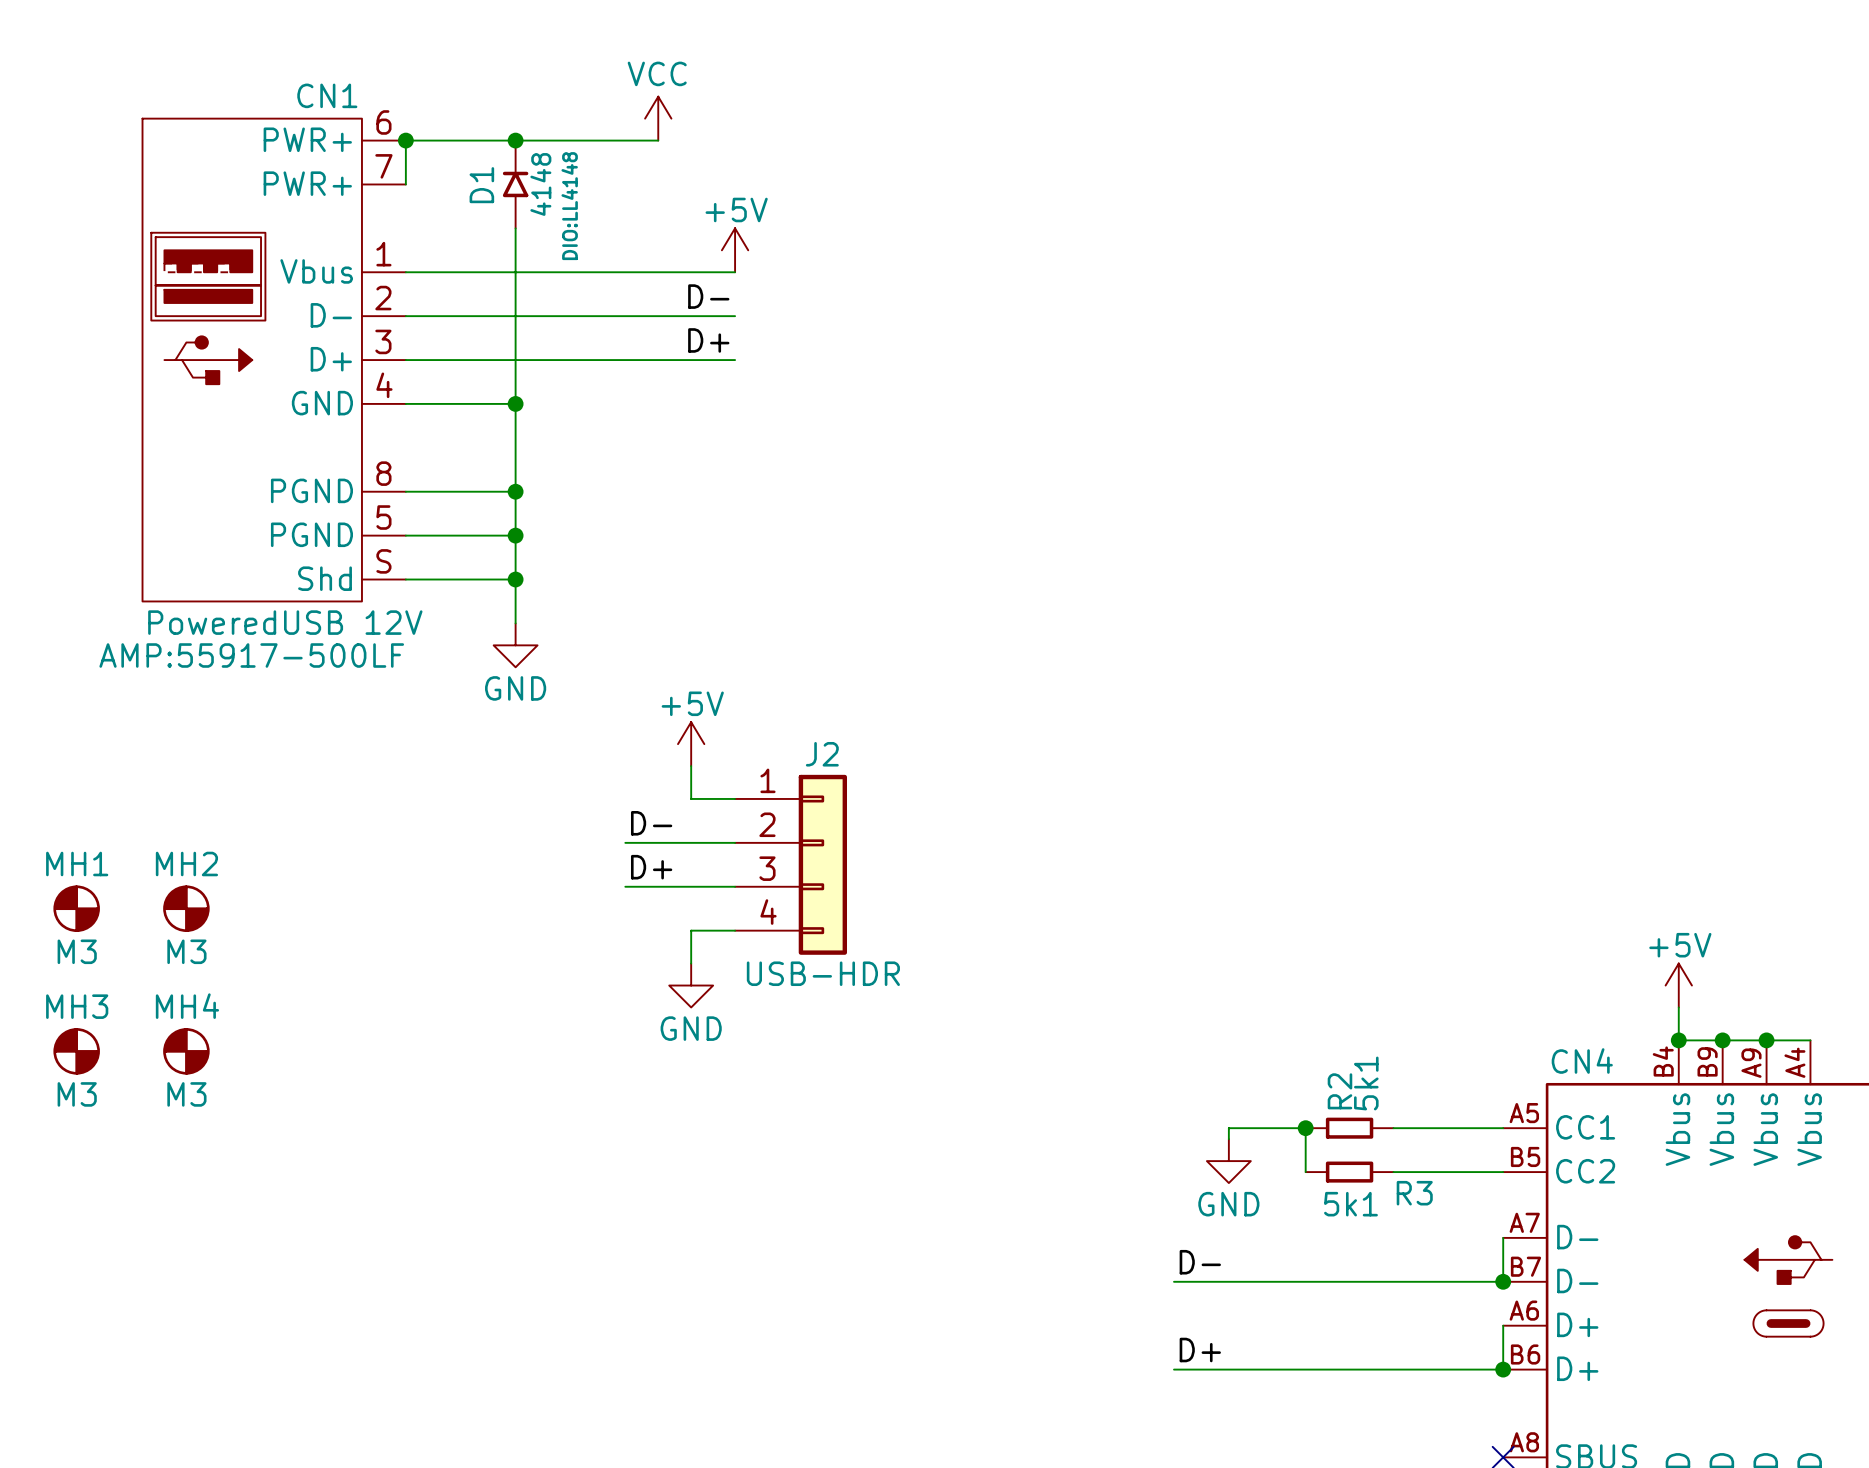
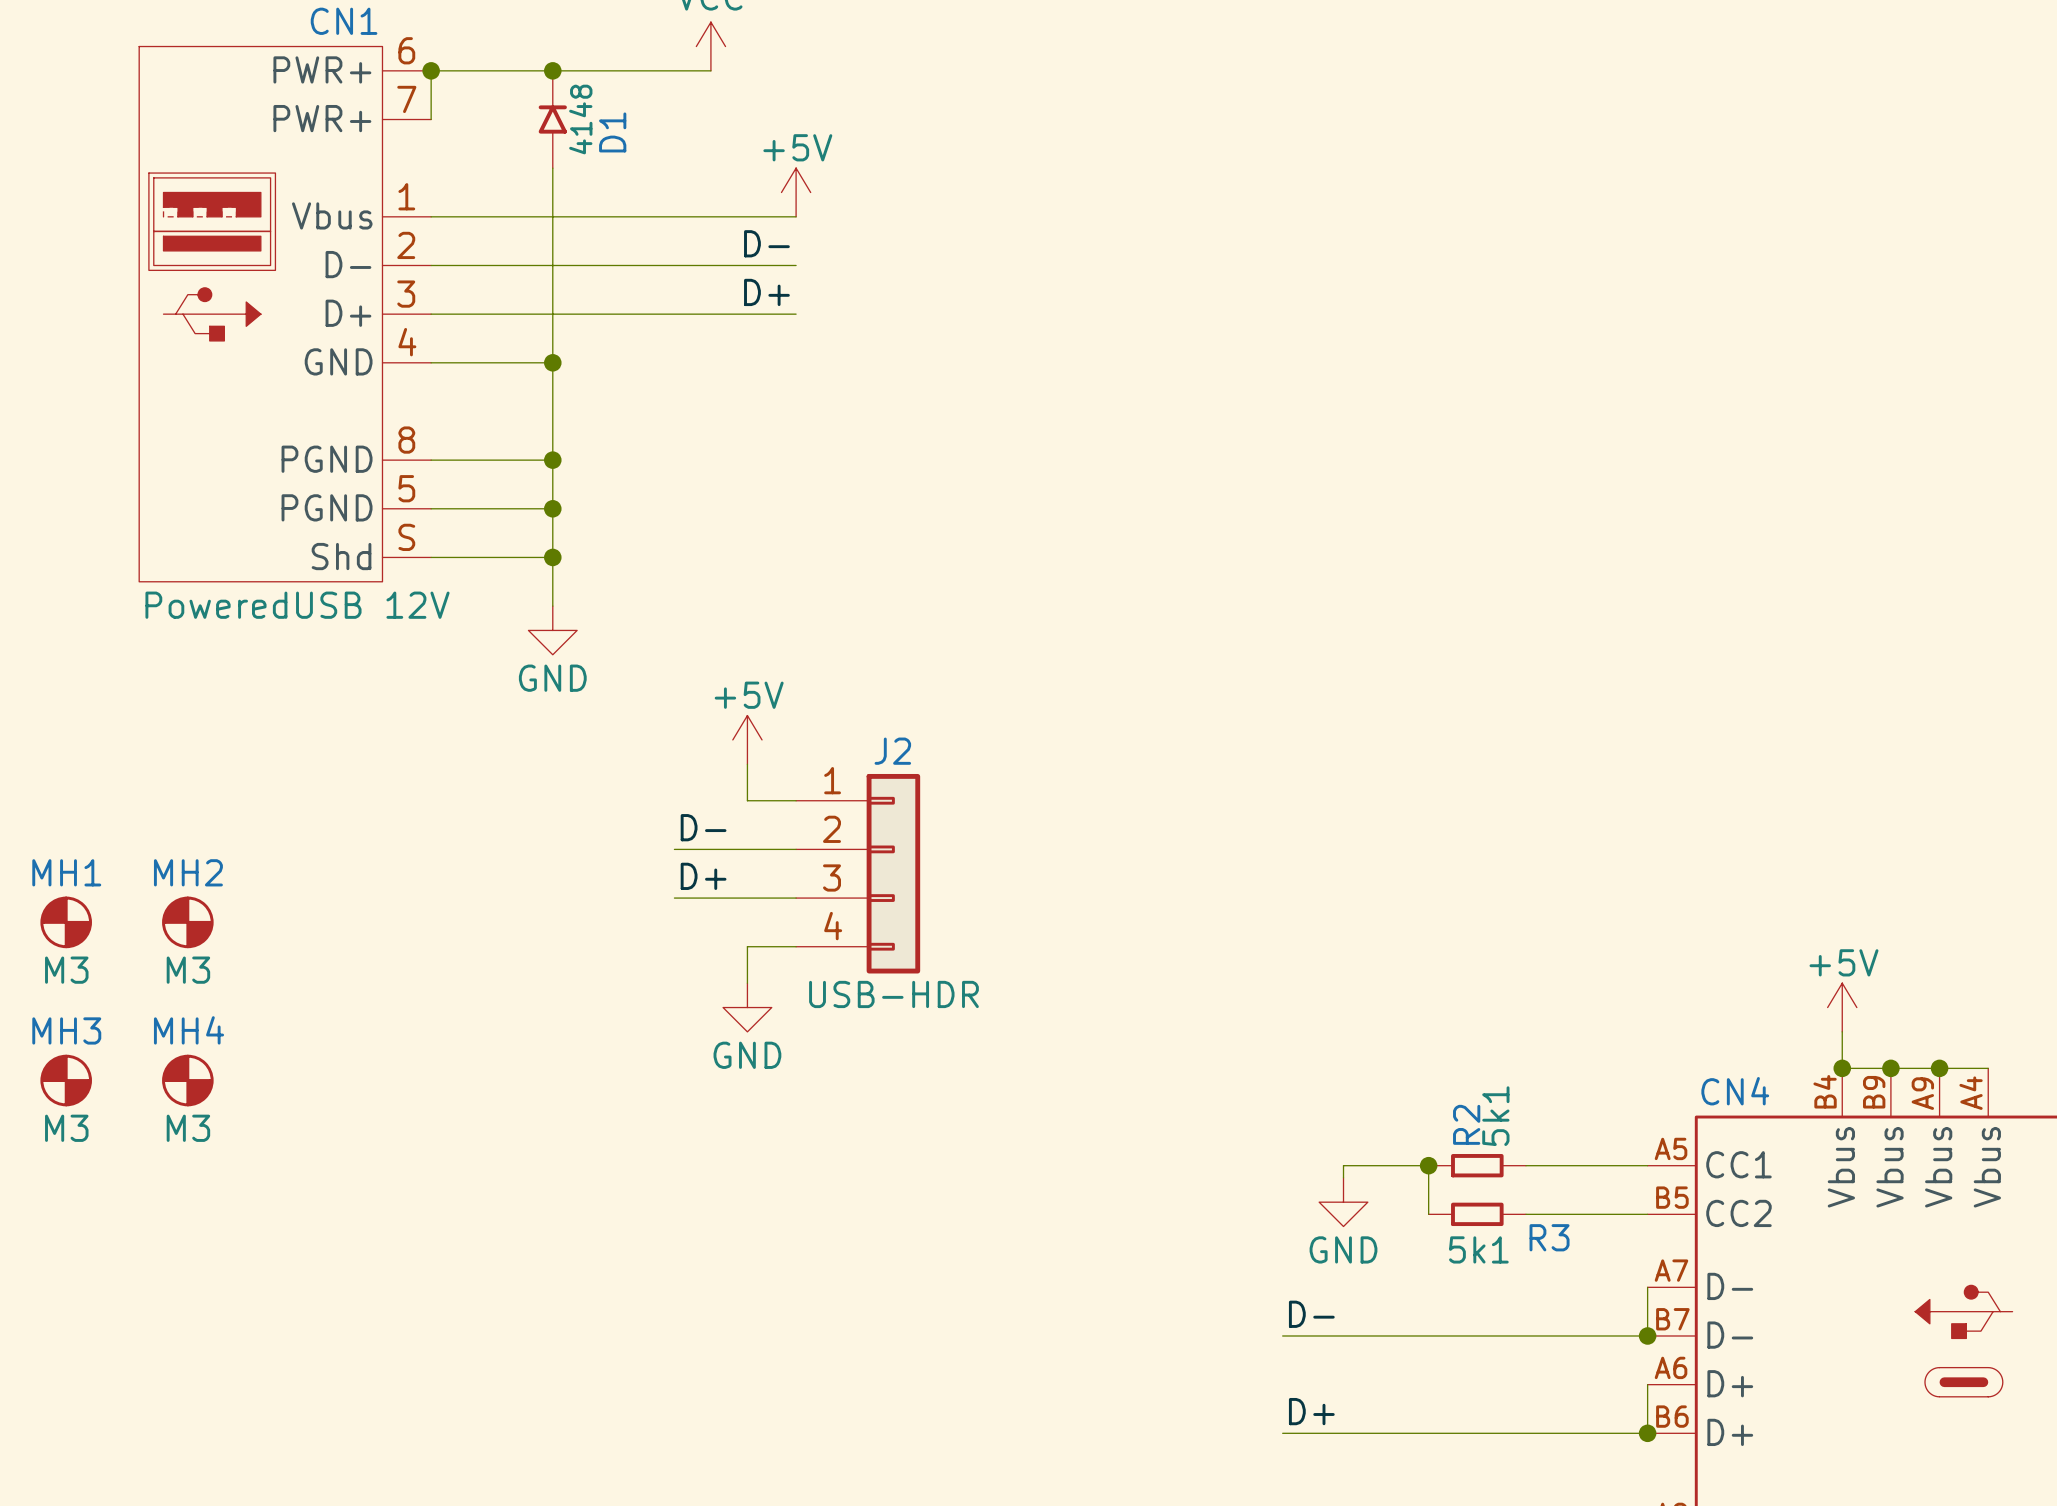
D1 name position: D1 (481, 185) -> D1 (612, 132)
D1 text: DIO:LL4148 (569, 206) -> none
CN1 text: AMP:55917-500LF (251, 655) -> none

